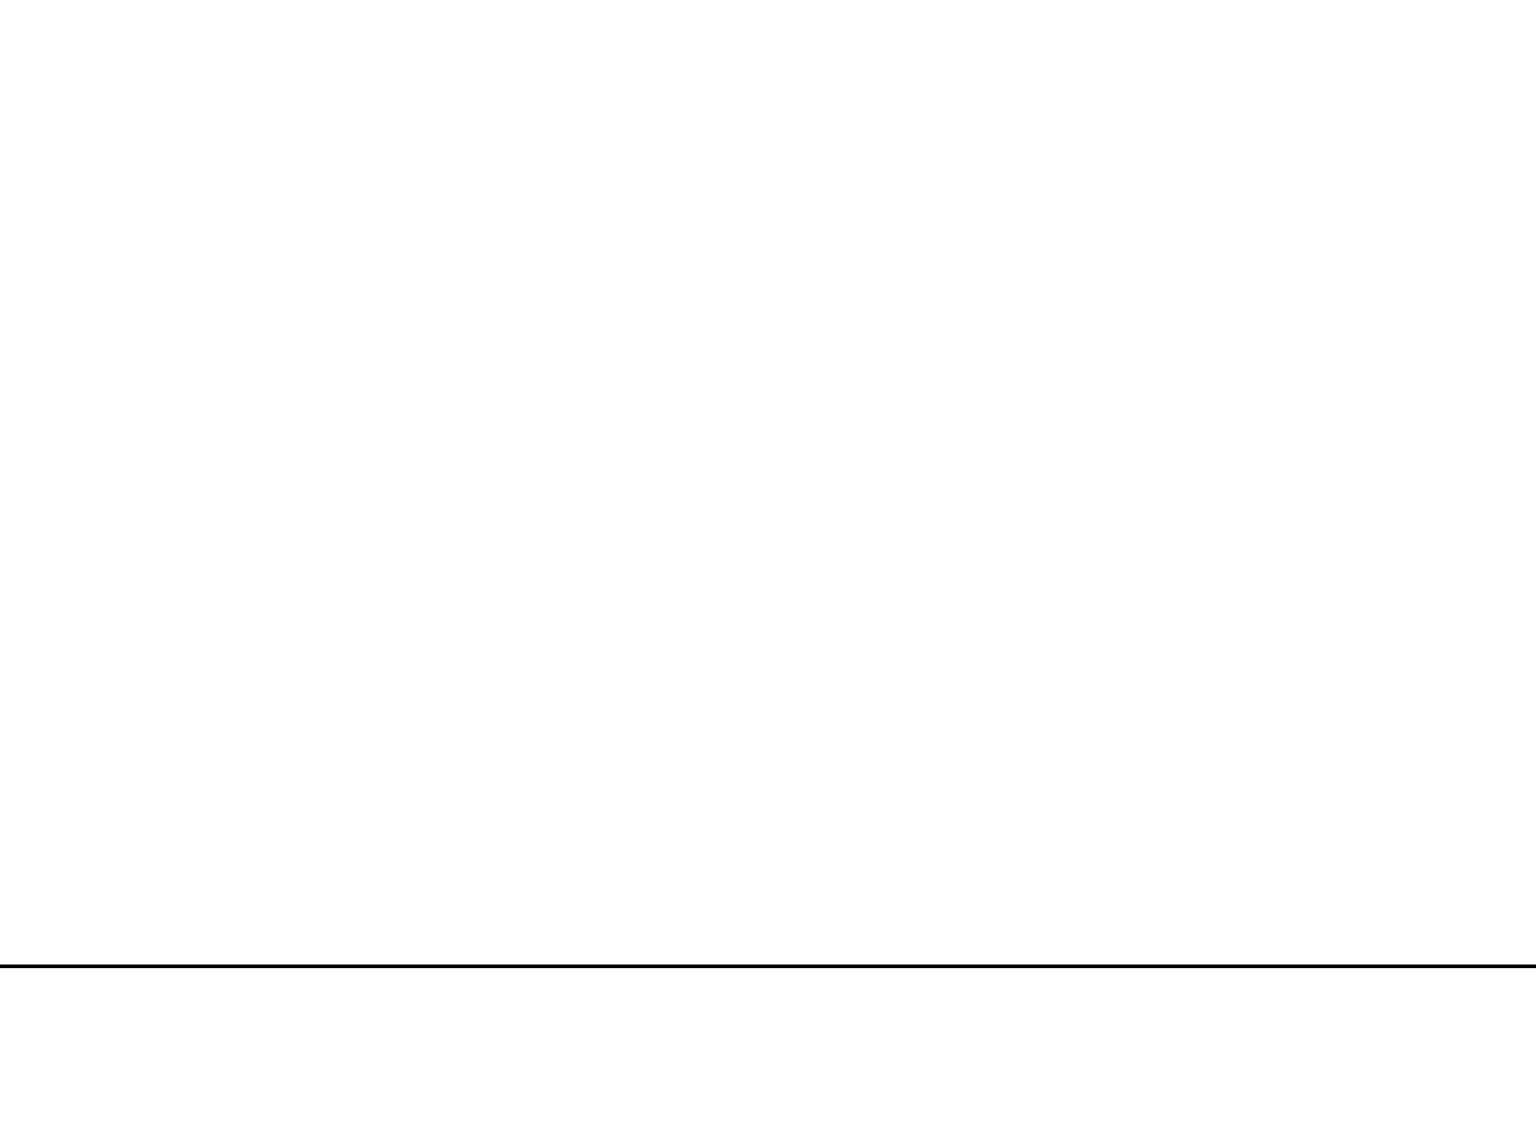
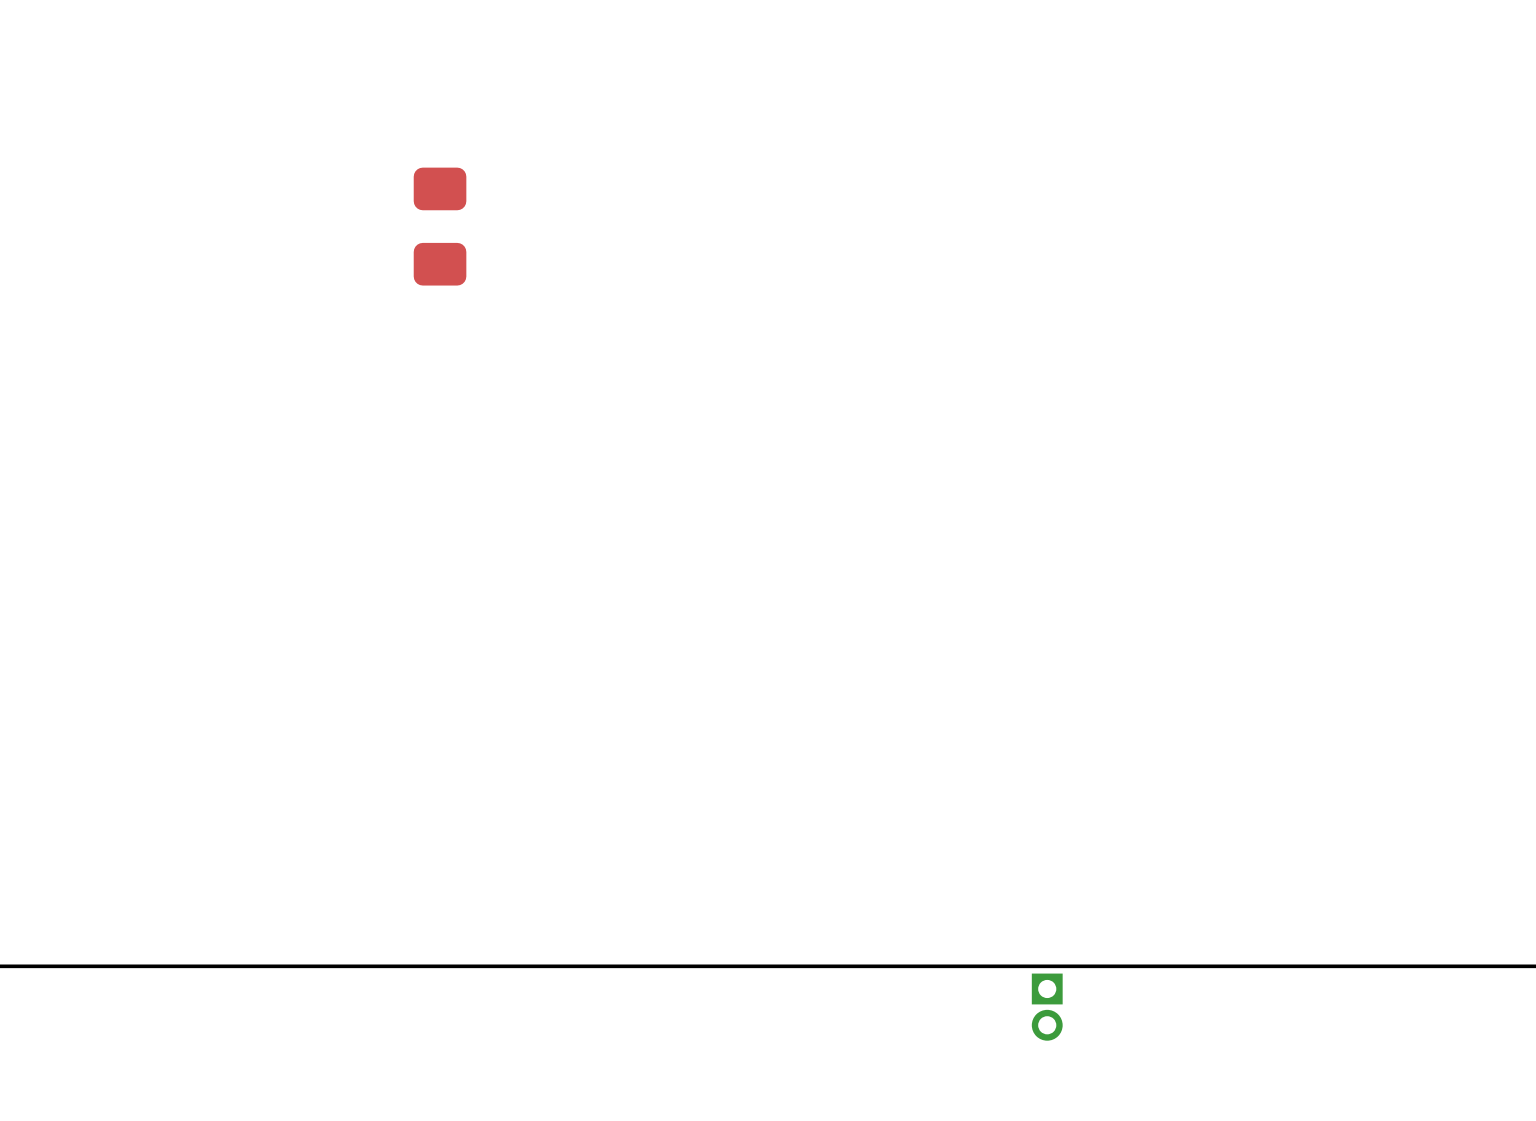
part: none -> (440, 226)
part: none -> (1047, 1007)

